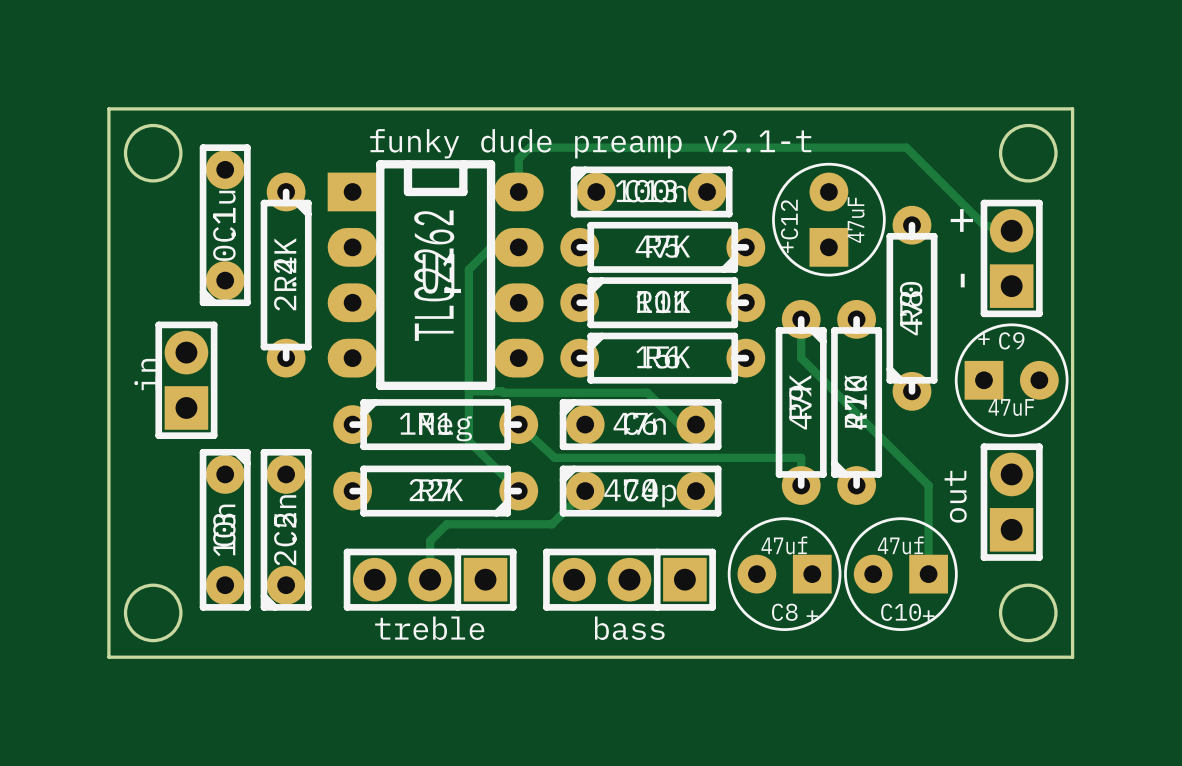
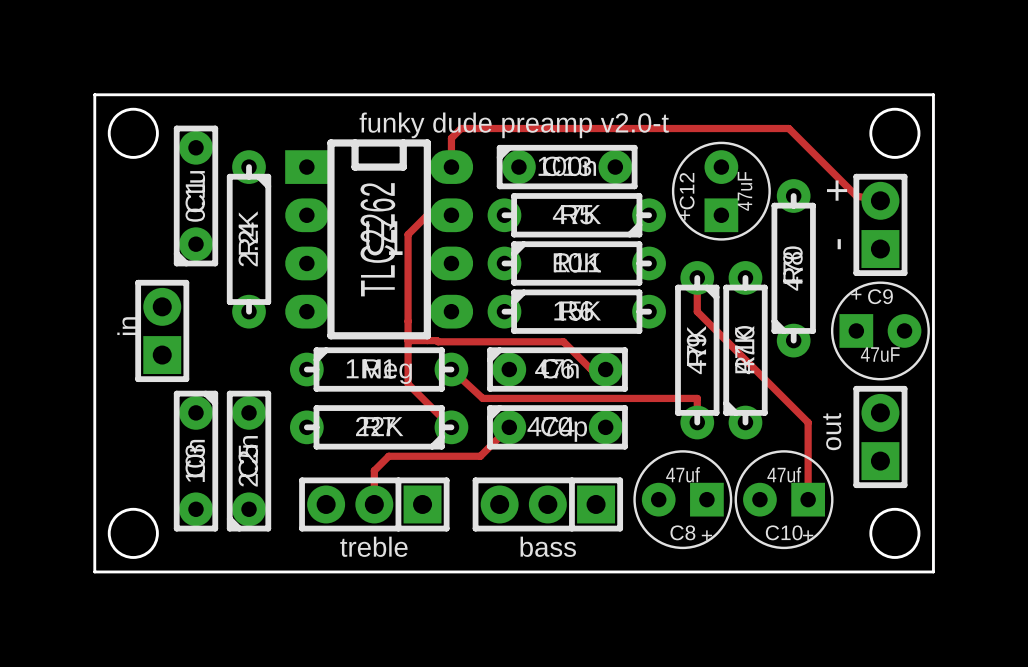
text: funky dude preamp v2.1-t (590, 143) -> funky dude preamp v2.0-t (514, 125)

